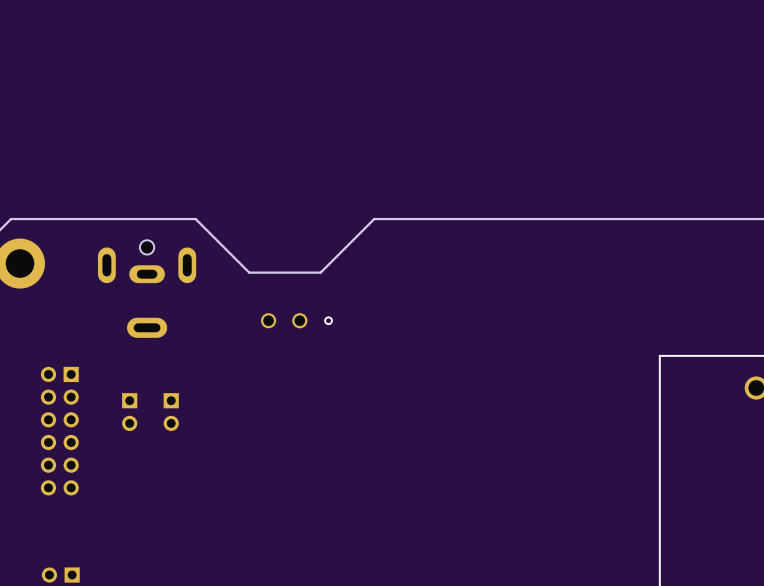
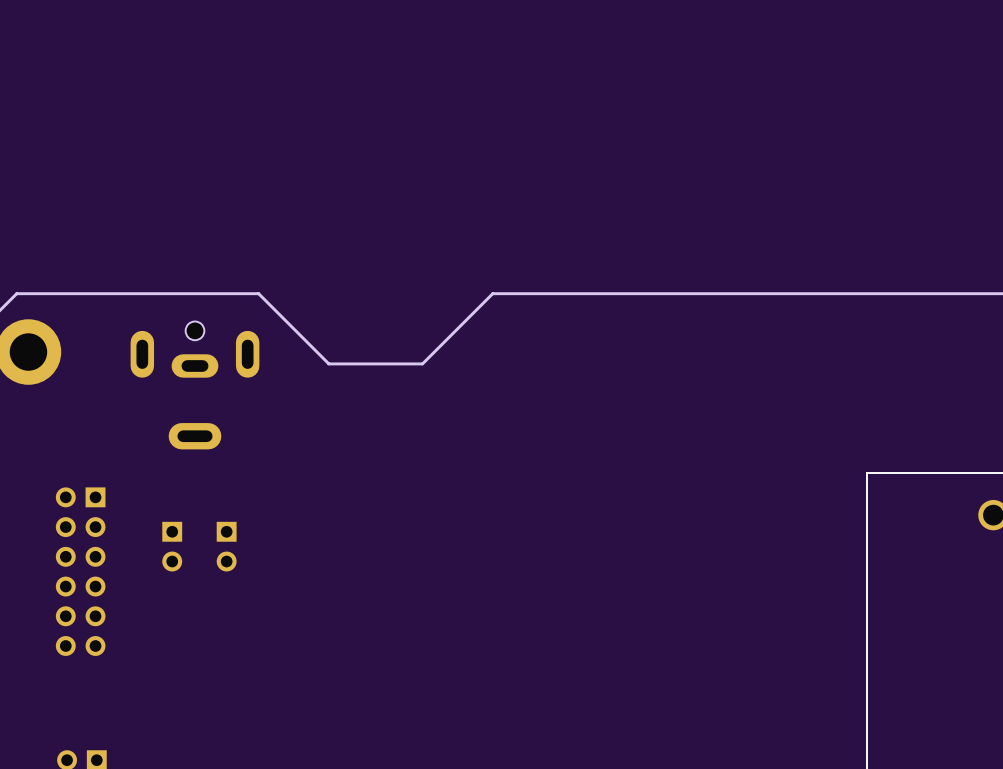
part: (296, 320) -> none

